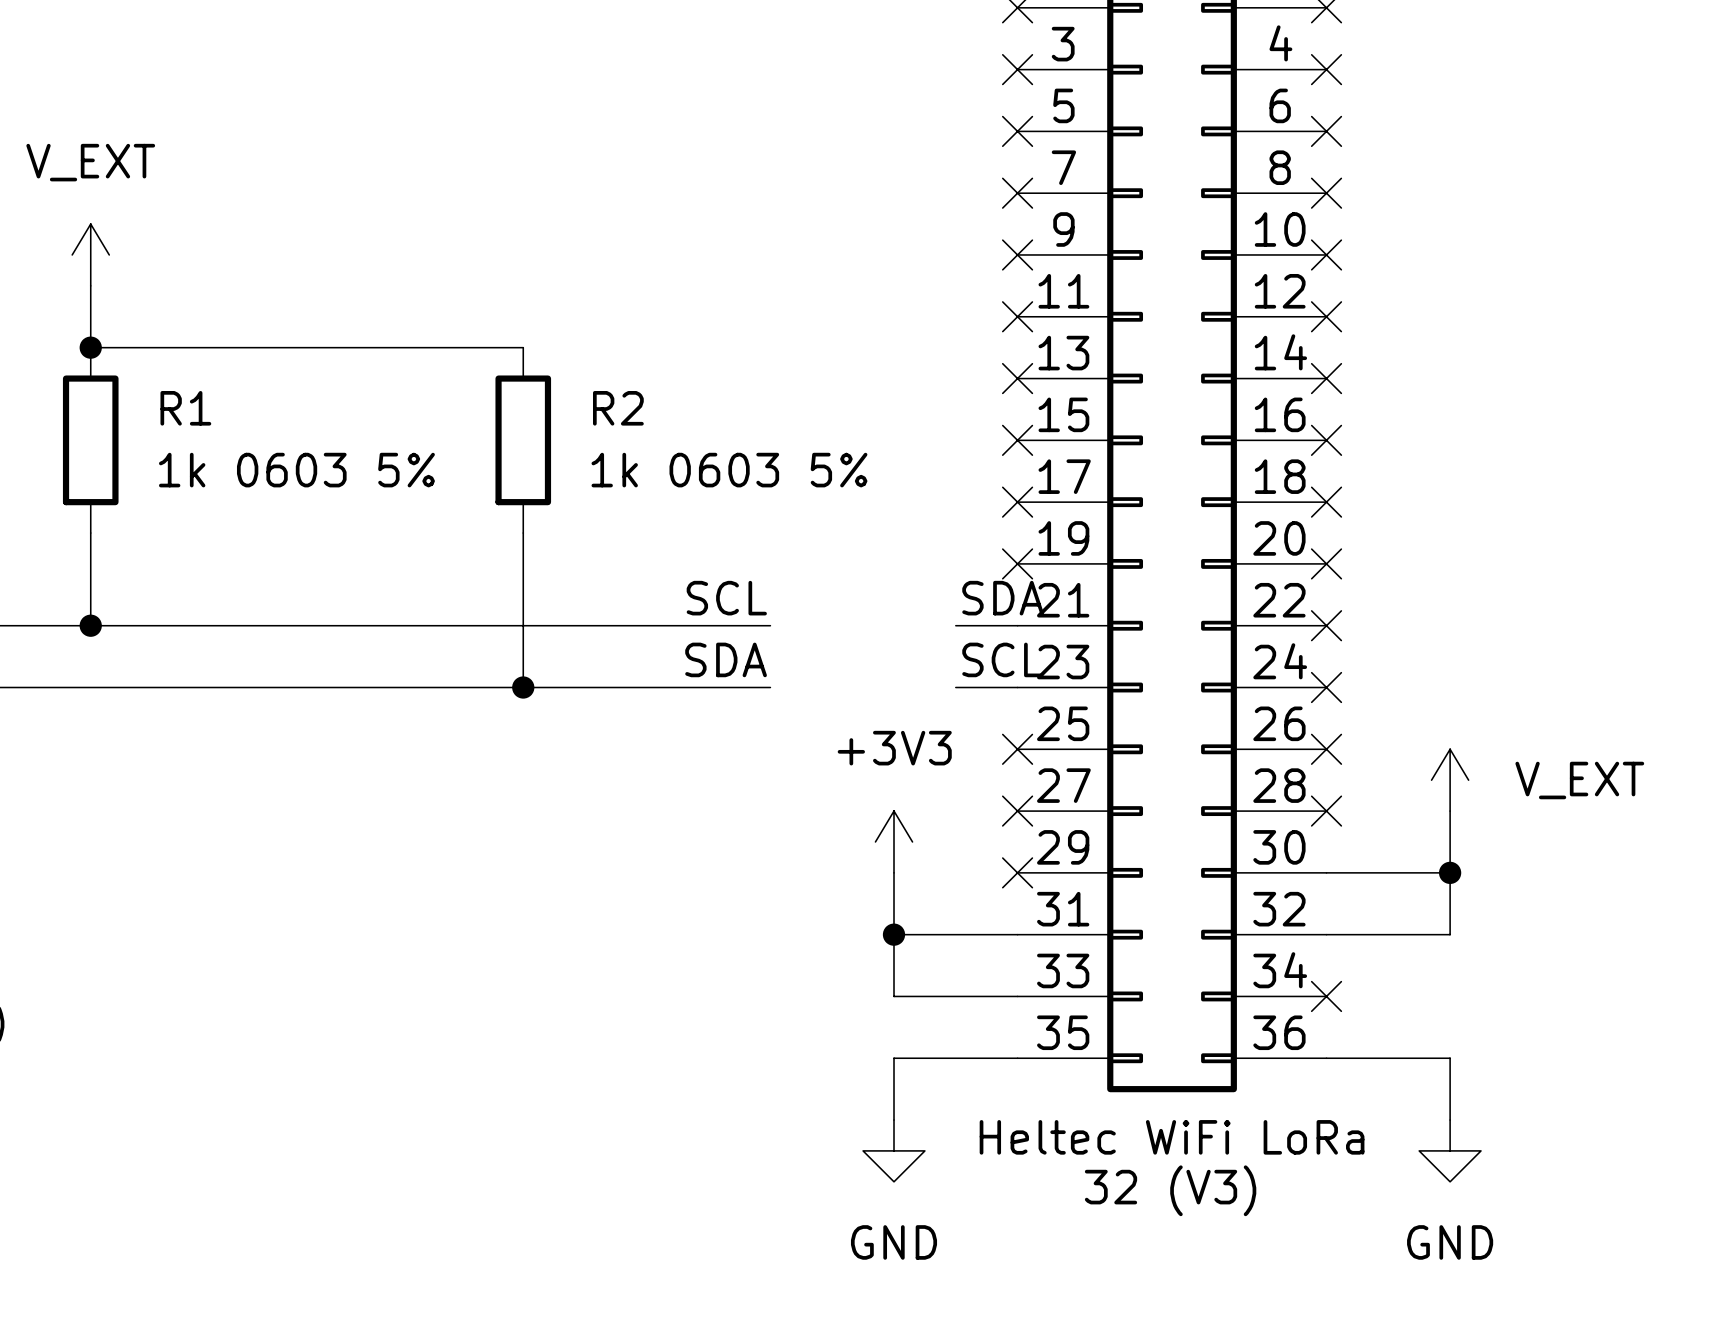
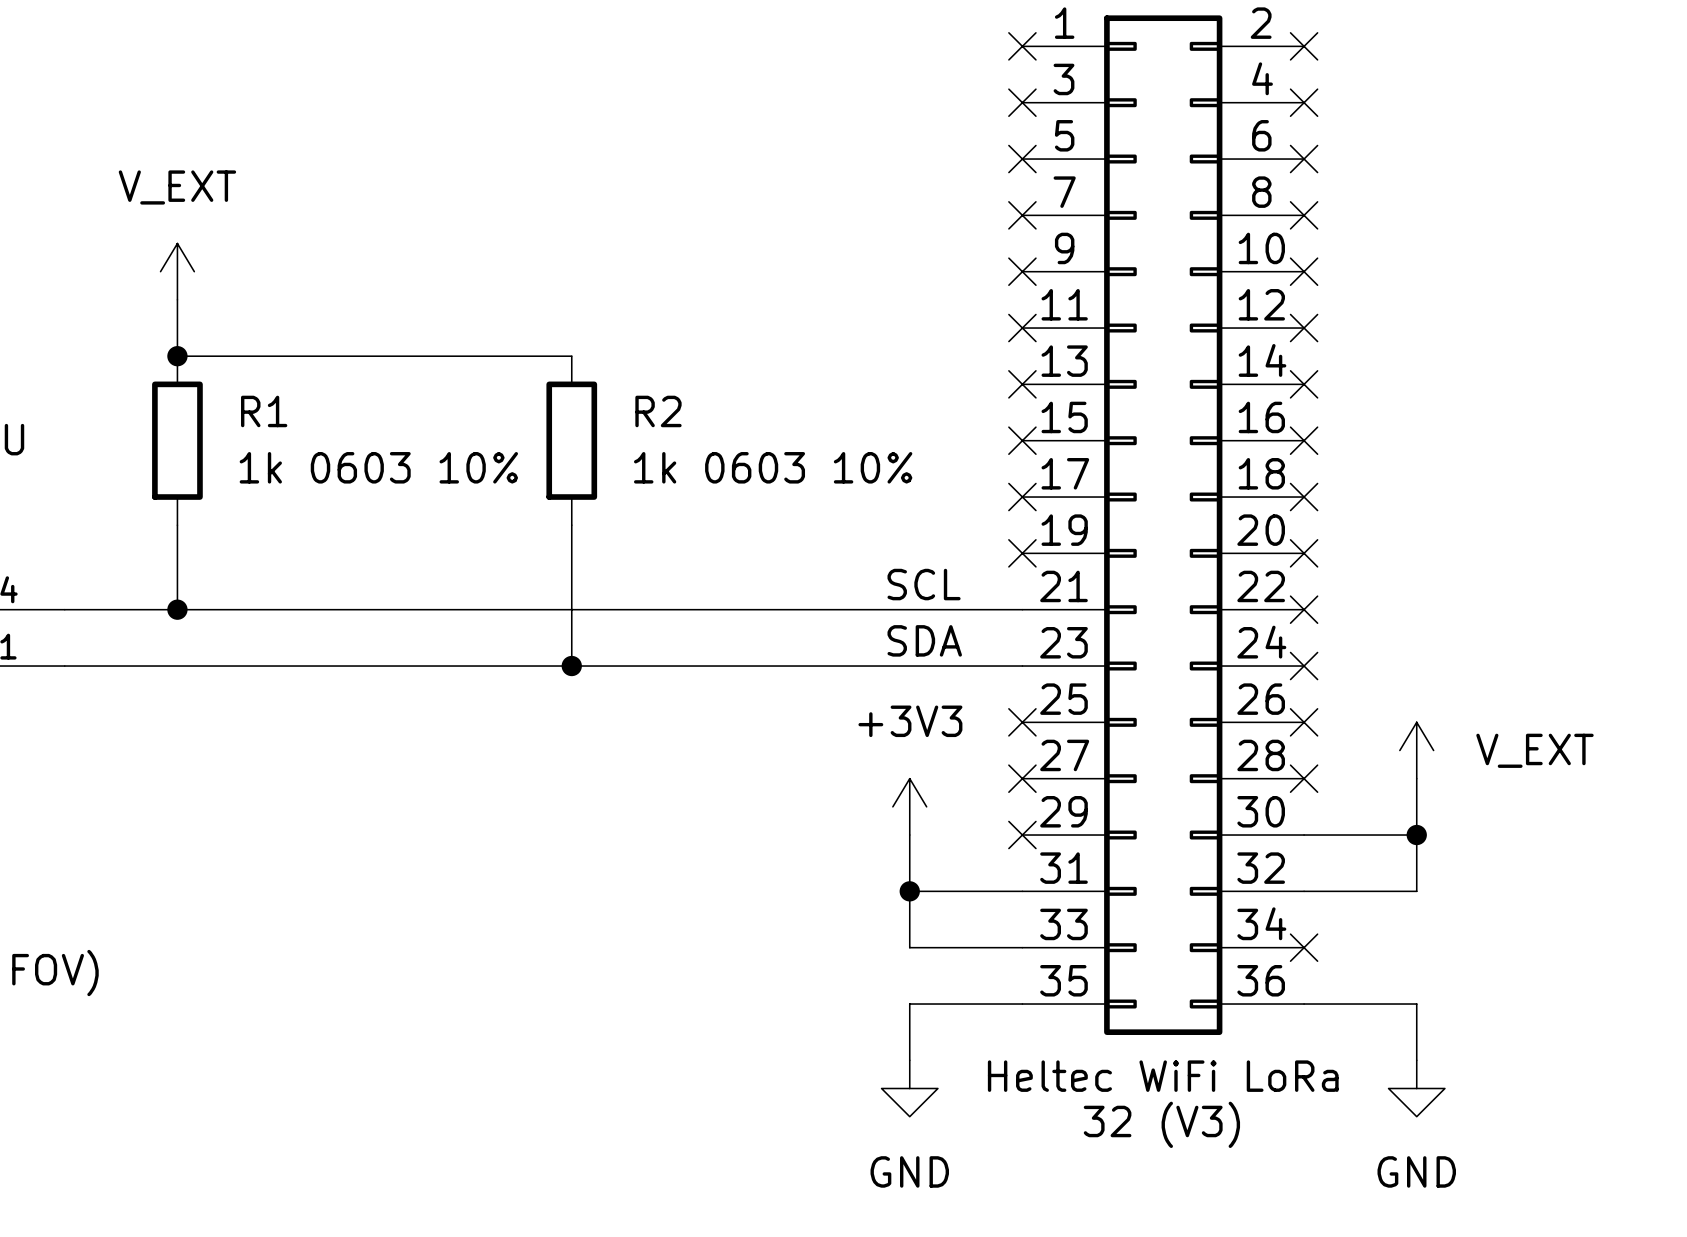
R1 value: 1k 0603 5% (296, 470) -> 1k 0603 10% (378, 467)
R2 value: 1k 0603 5% (729, 470) -> 1k 0603 10% (773, 467)
label: SCL (726, 598) -> none
label position: SDA (1003, 598) -> SDA (924, 640)
wire: none -> (797, 609) (966, 609)
label: SDA (726, 659) -> none
label position: SCL (1002, 659) -> SCL (924, 584)
wire: none -> (797, 666) (966, 666)

